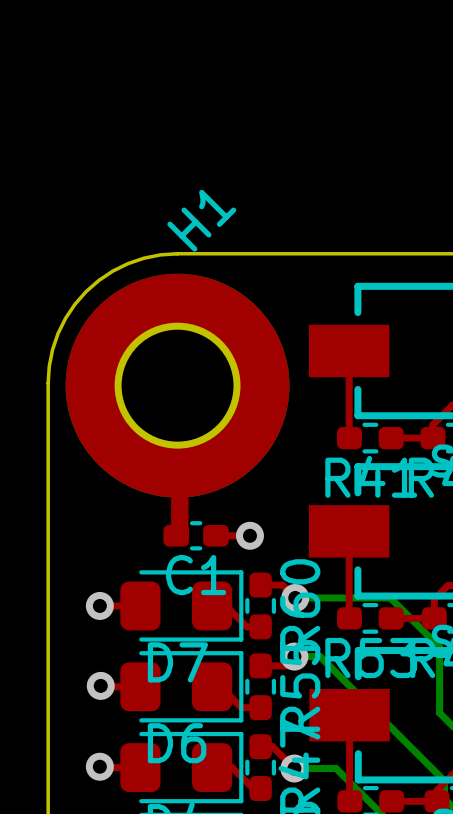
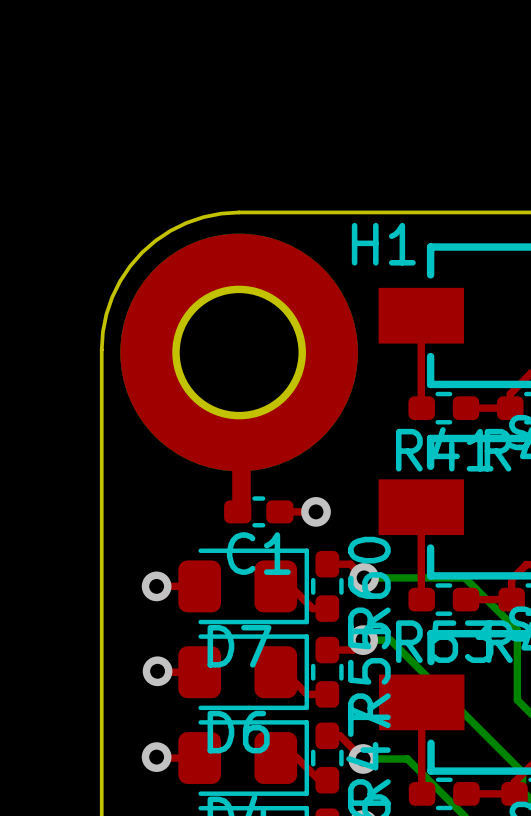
H1 name rotation: 0° (201, 220) -> 45° clockwise (383, 244)
H1 name position: H1 (201, 220) -> H1 (383, 244)

